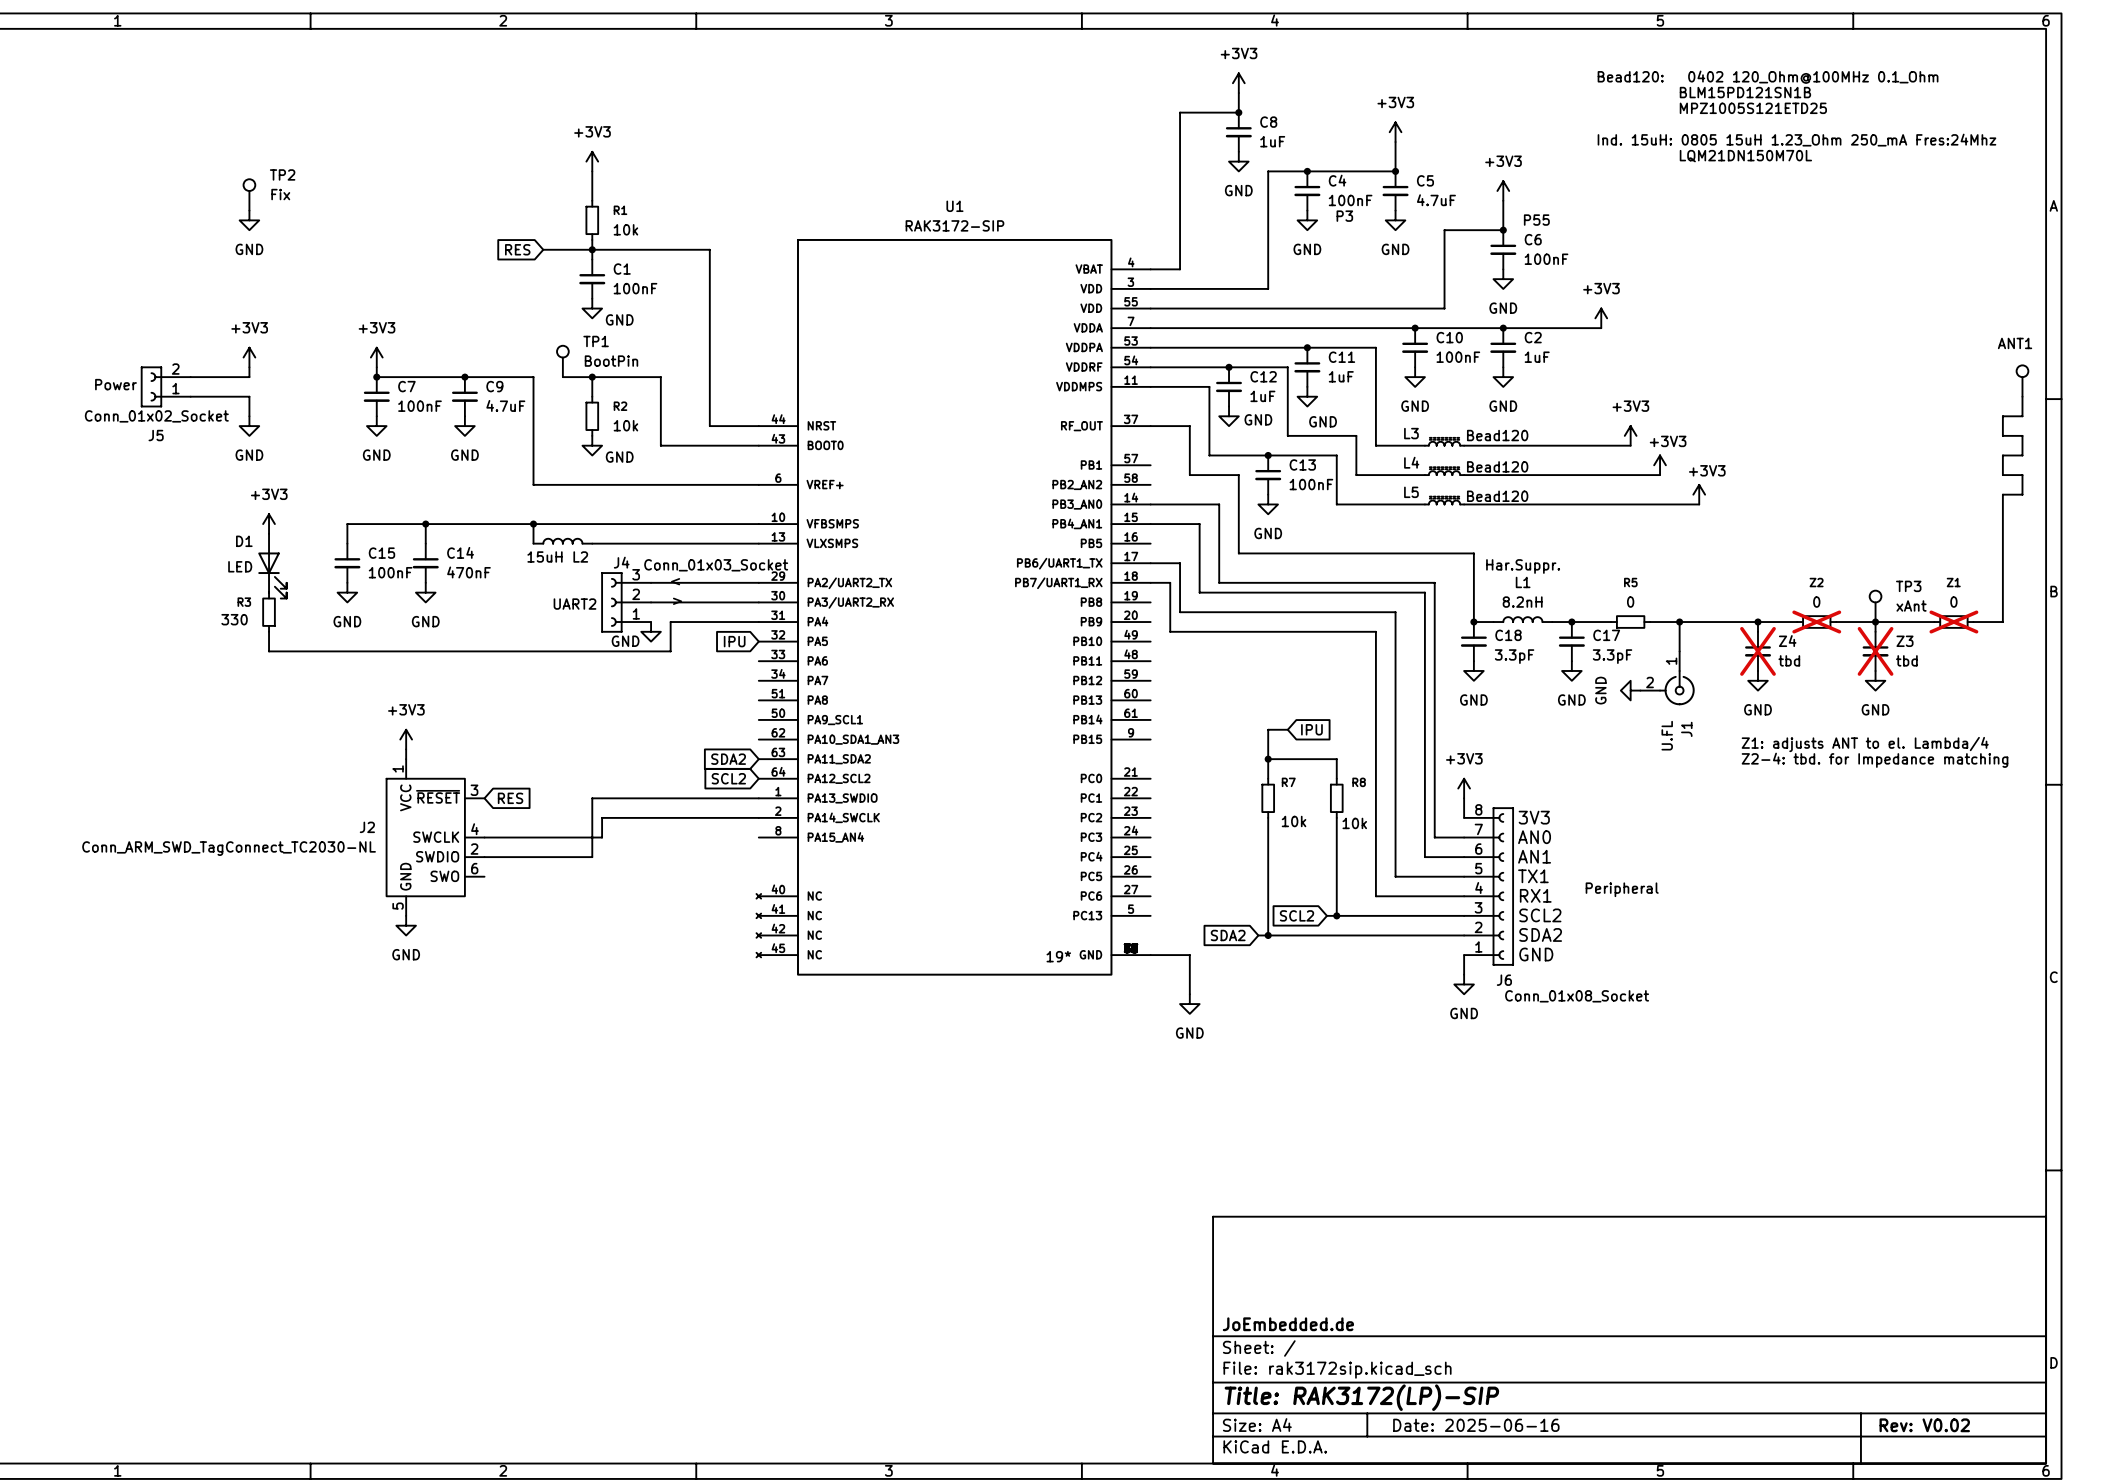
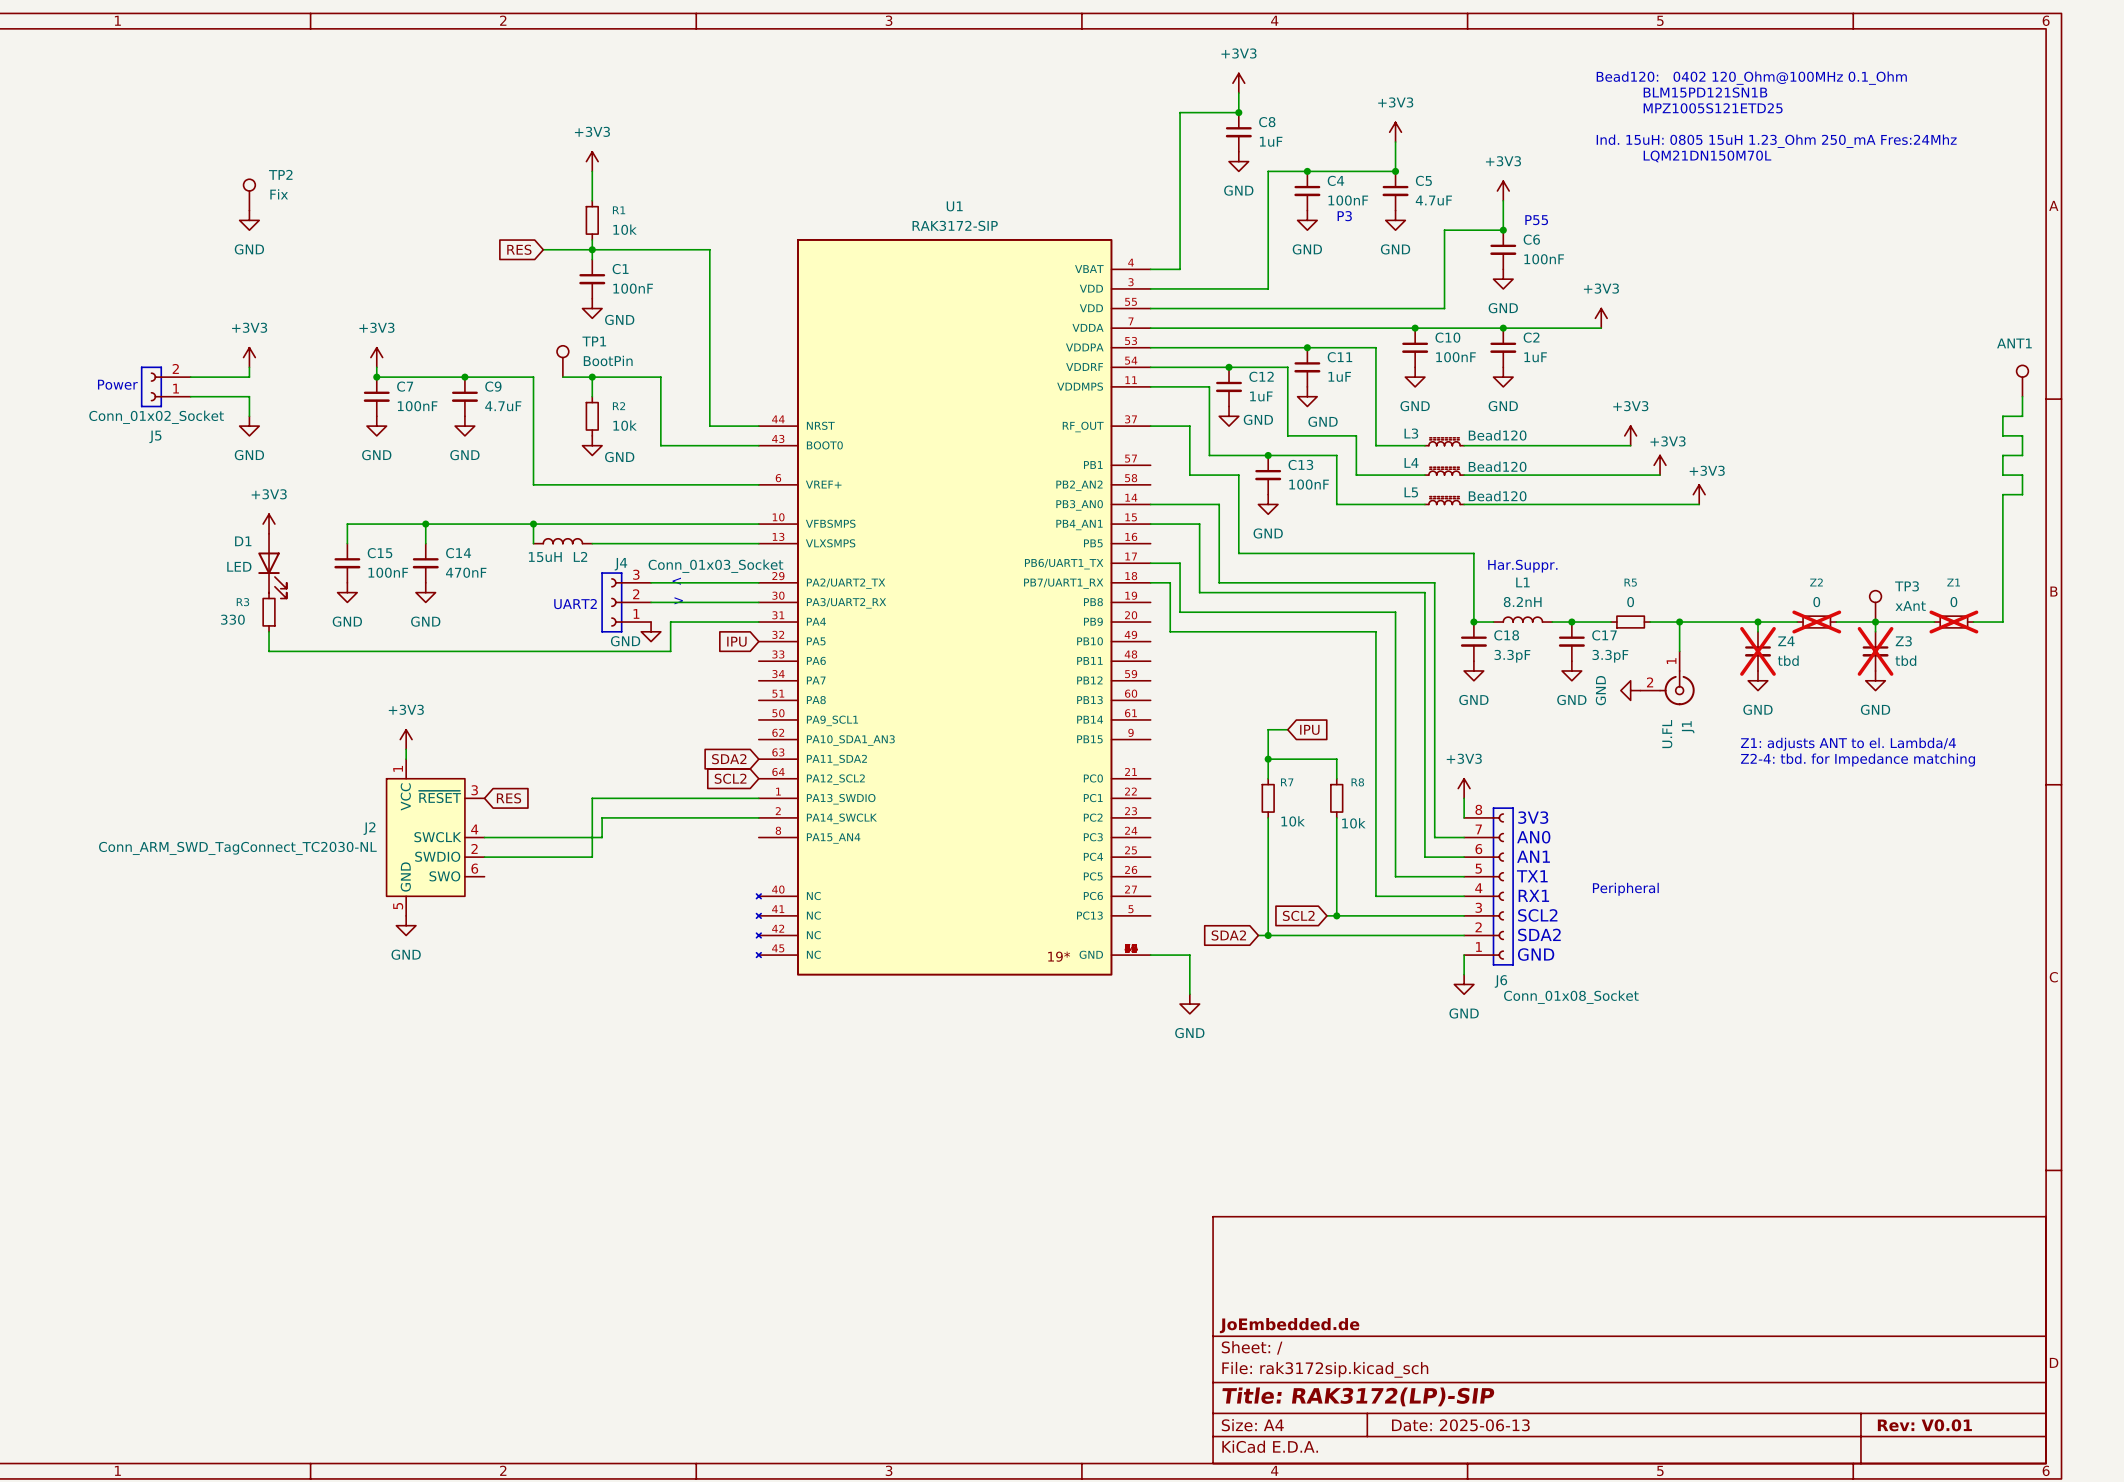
title block: Date: 2025-06-16 (1476, 1425) -> Date: 2025-06-13 (1460, 1425)
title block: Rev: V0.02 (1924, 1425) -> Rev: V0.01 (1924, 1425)

